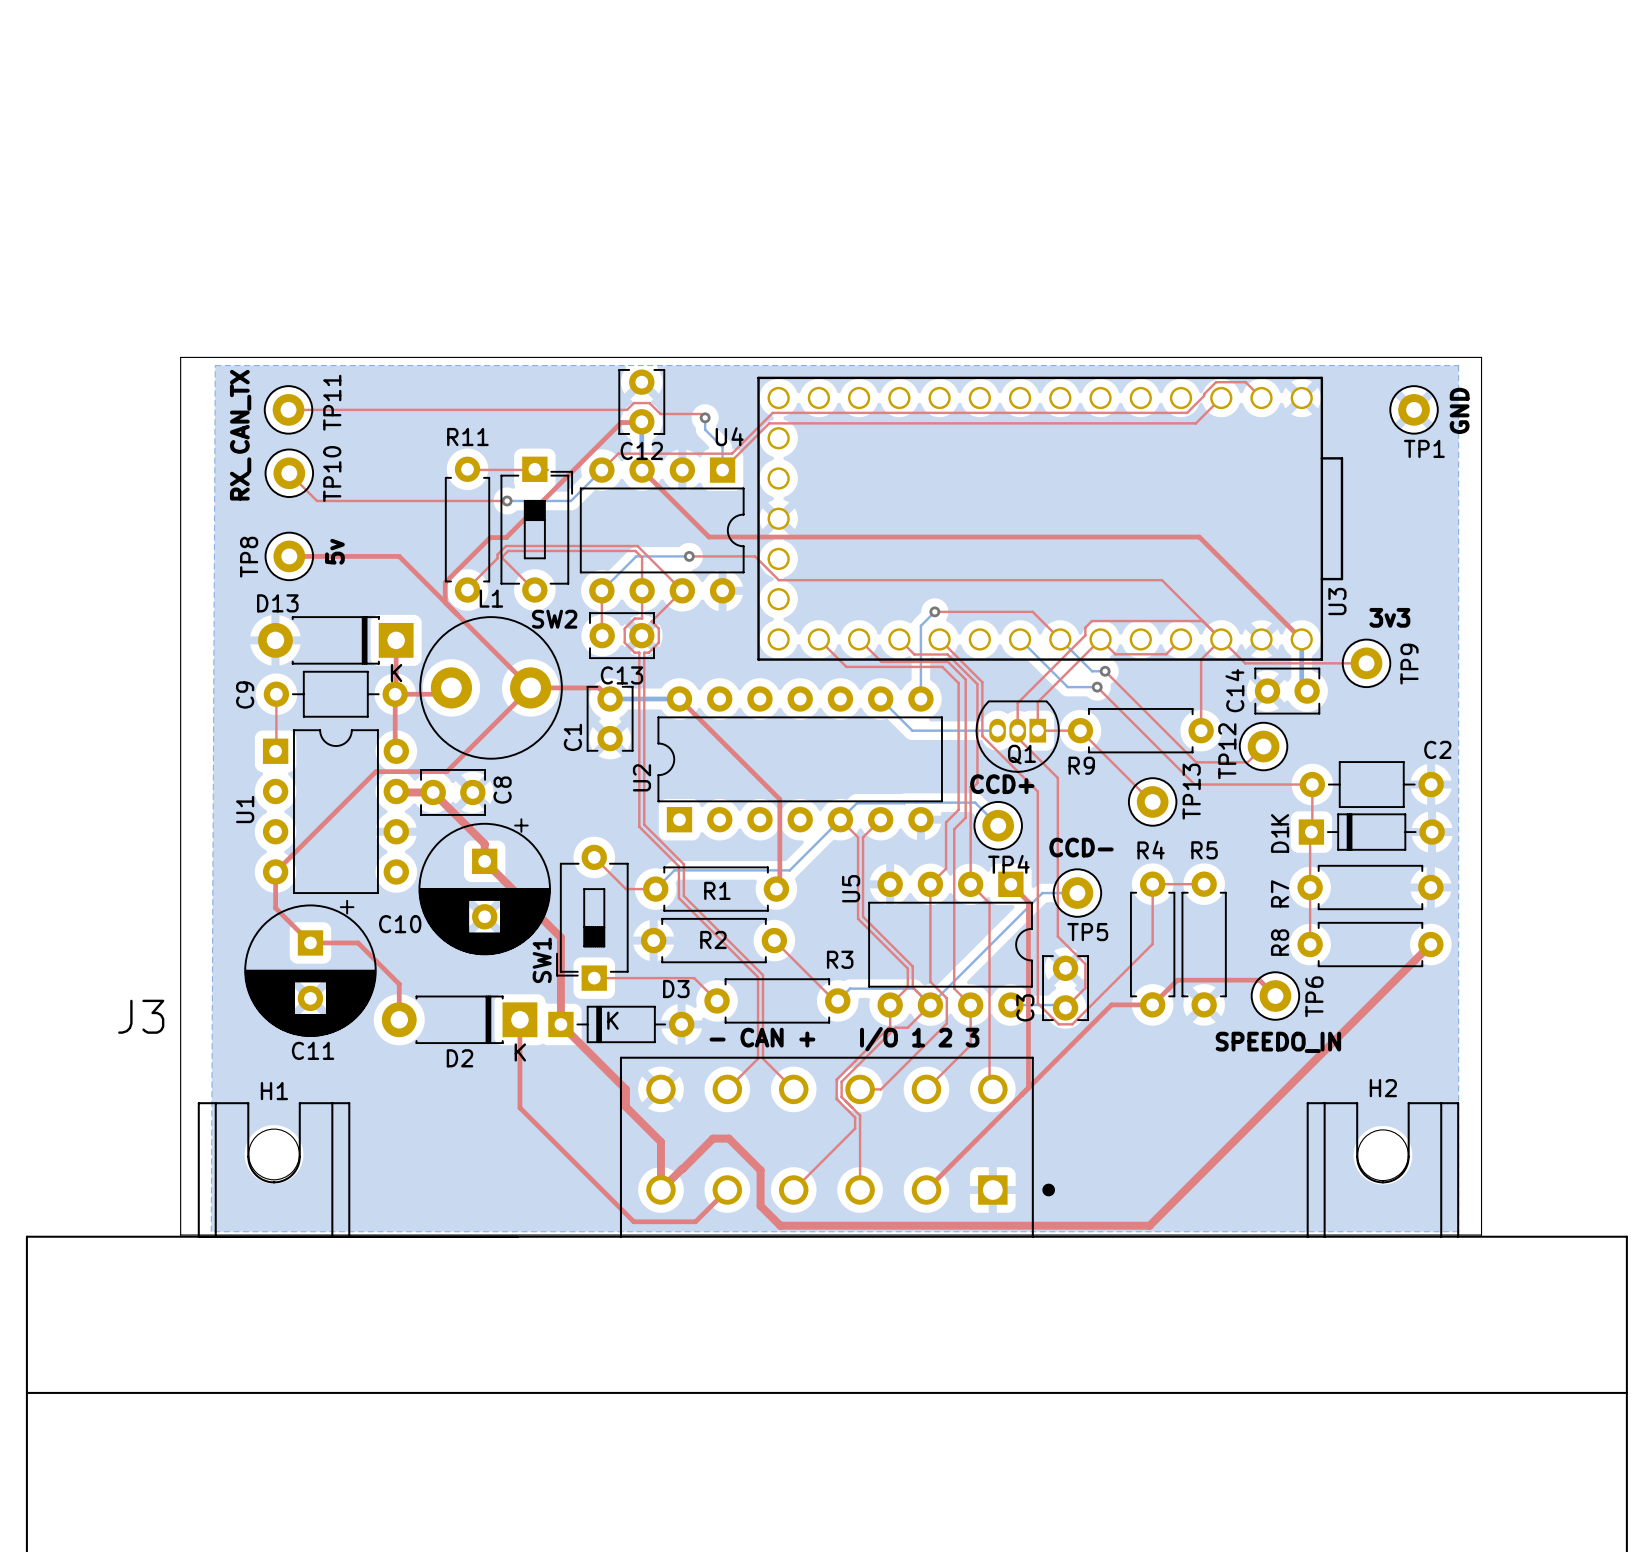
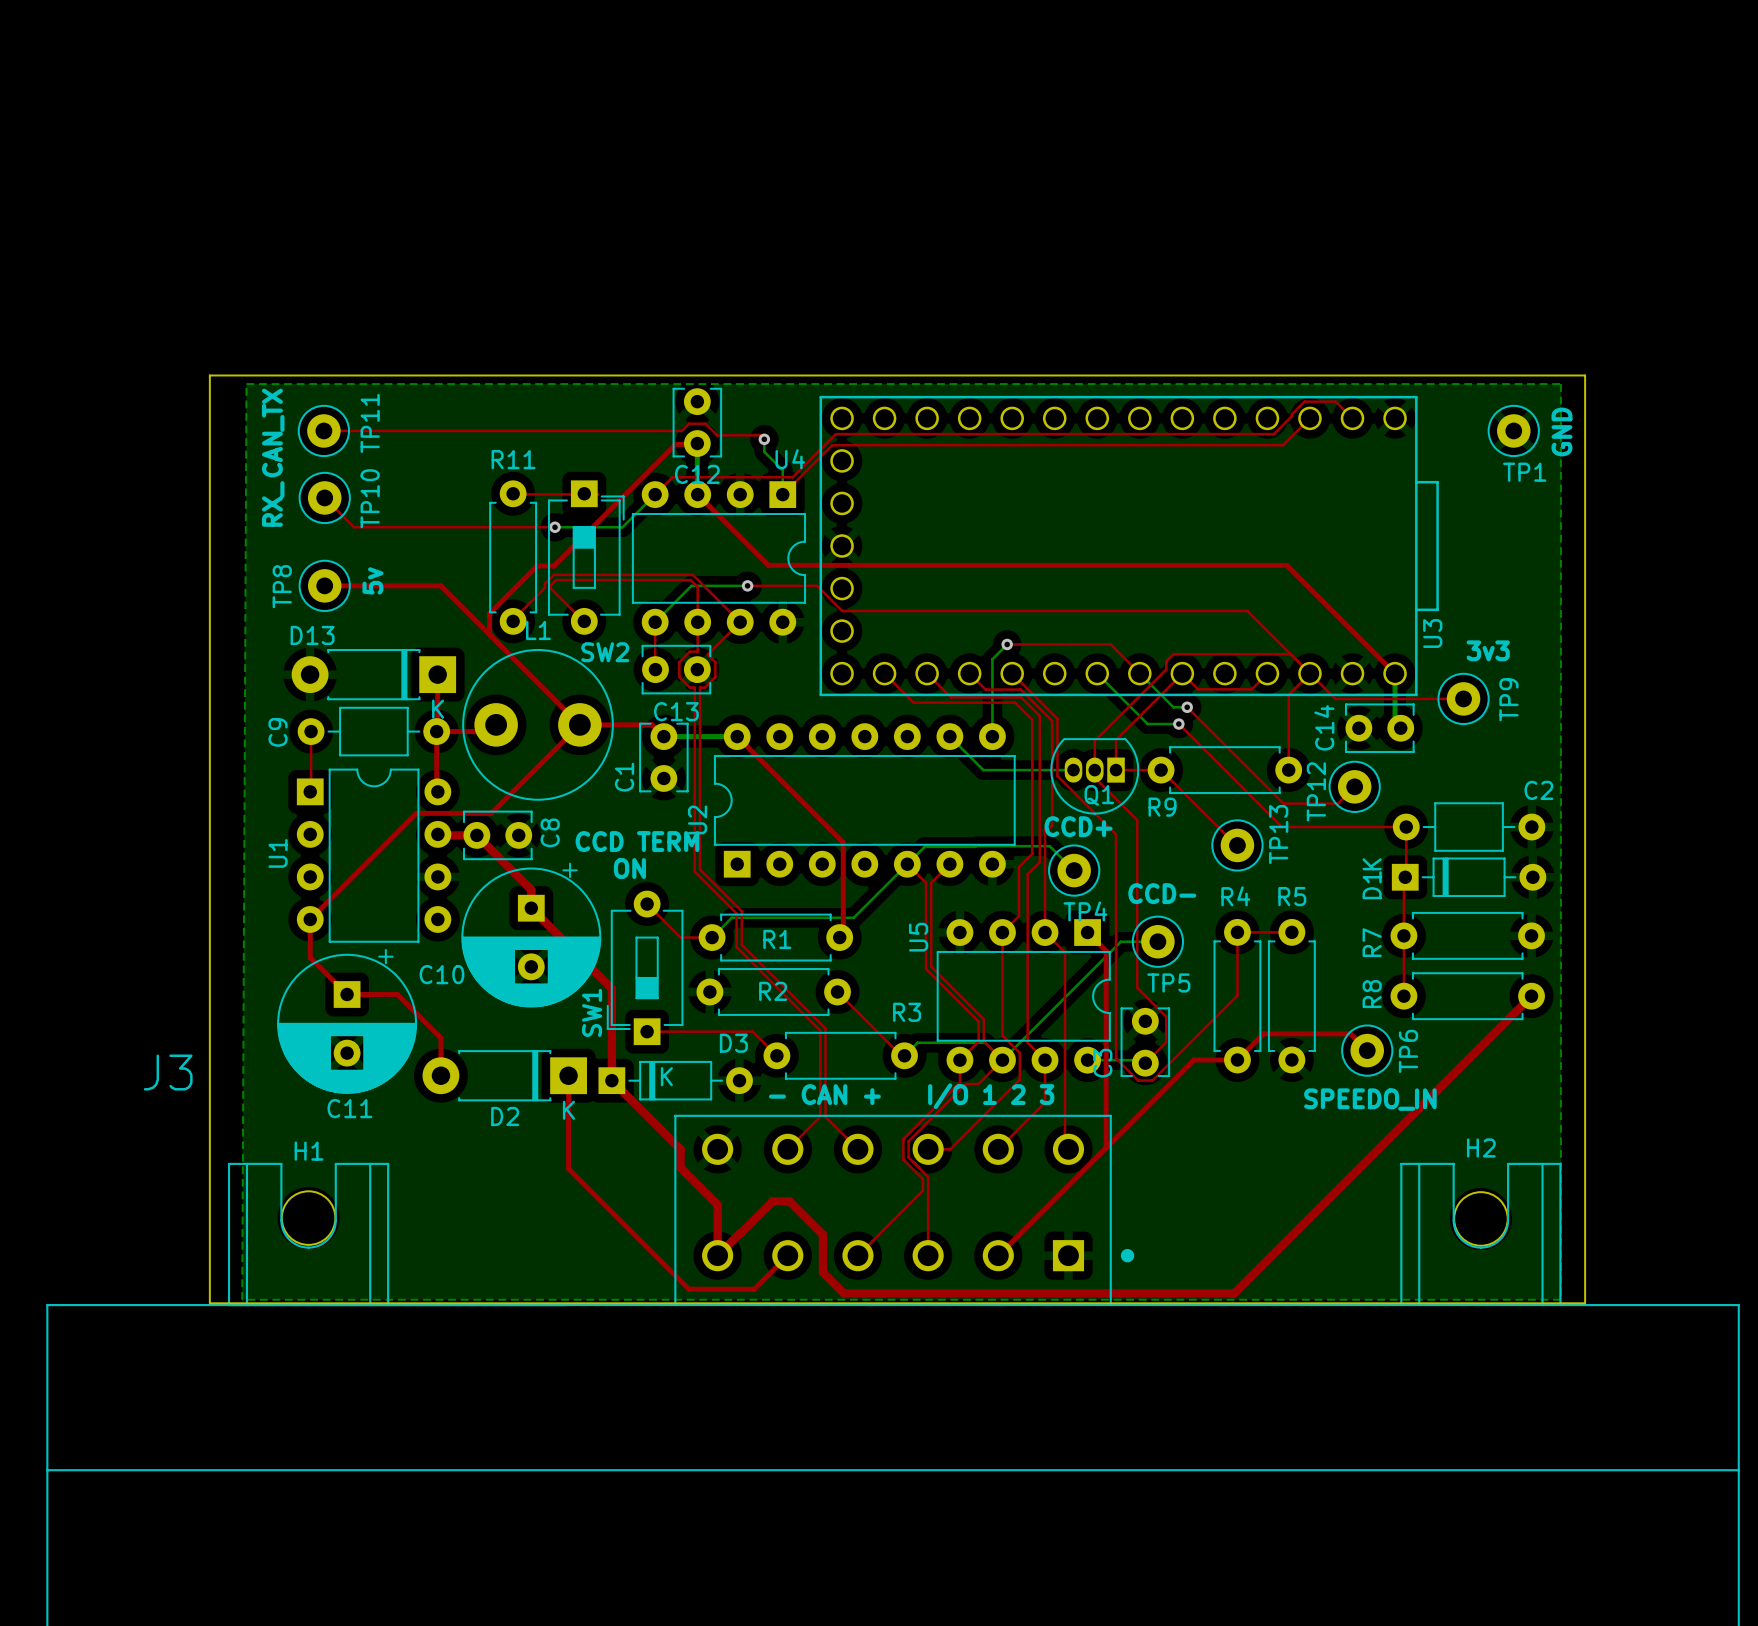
text: none -> CCD TERM (637, 841)
text: none -> ON (629, 868)

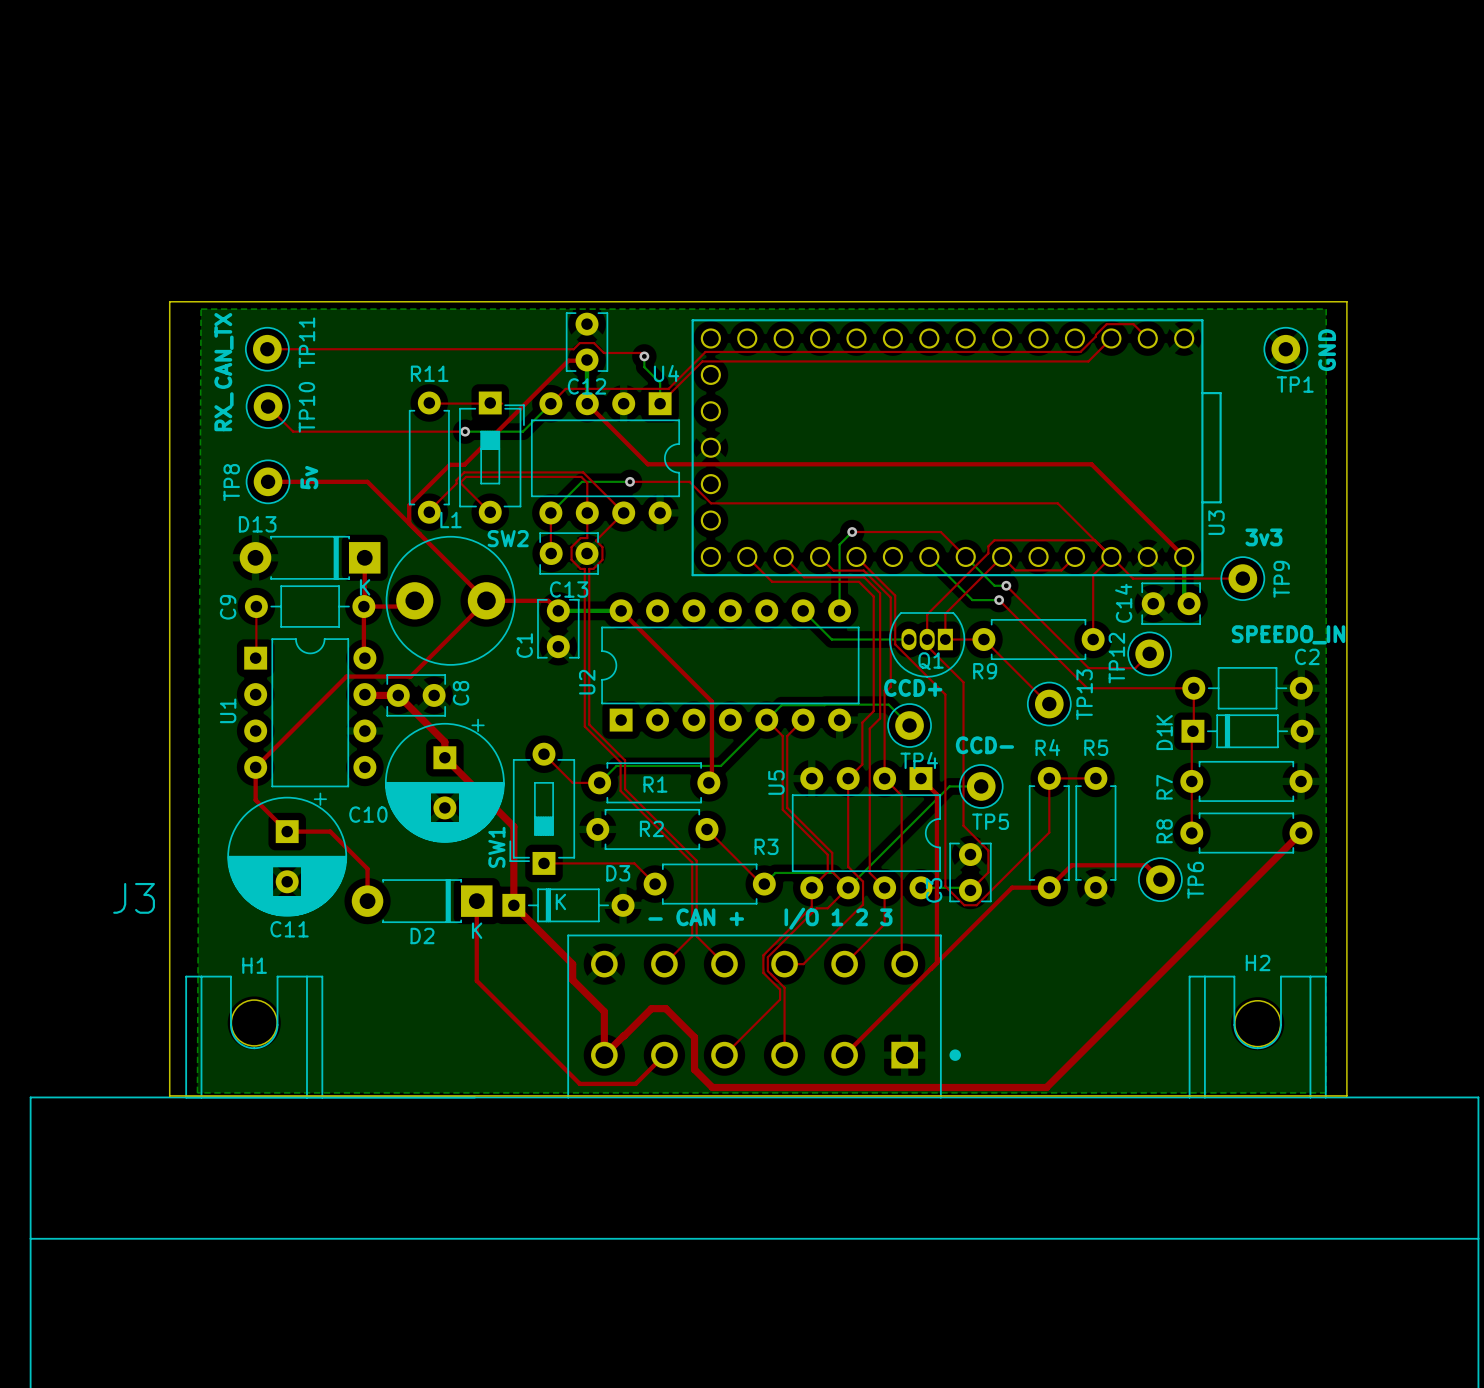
text: CCD TERM (637, 841) -> none
text: ON (629, 868) -> none
text position: SPEEDO_IN (1370, 1099) -> SPEEDO_IN (1288, 634)

